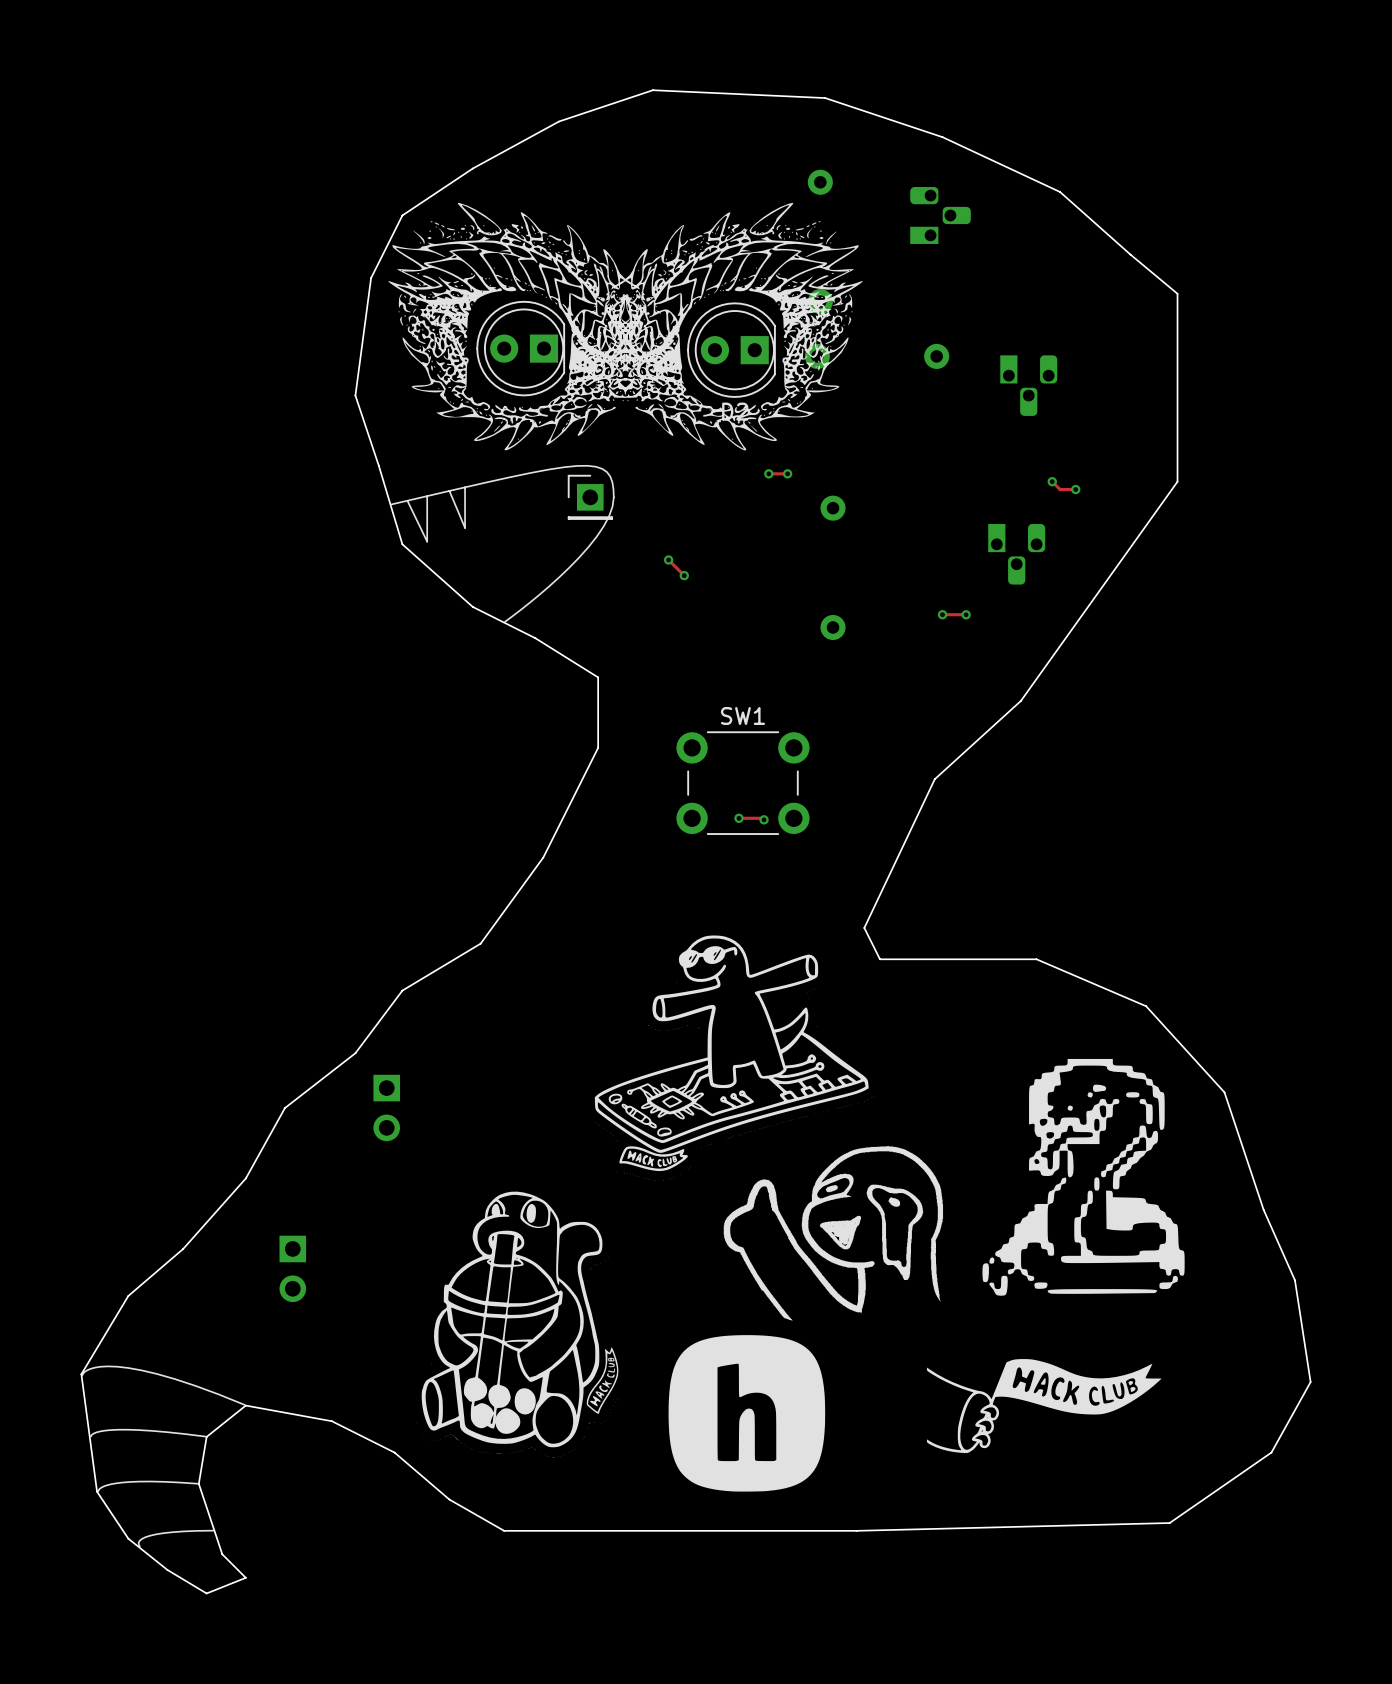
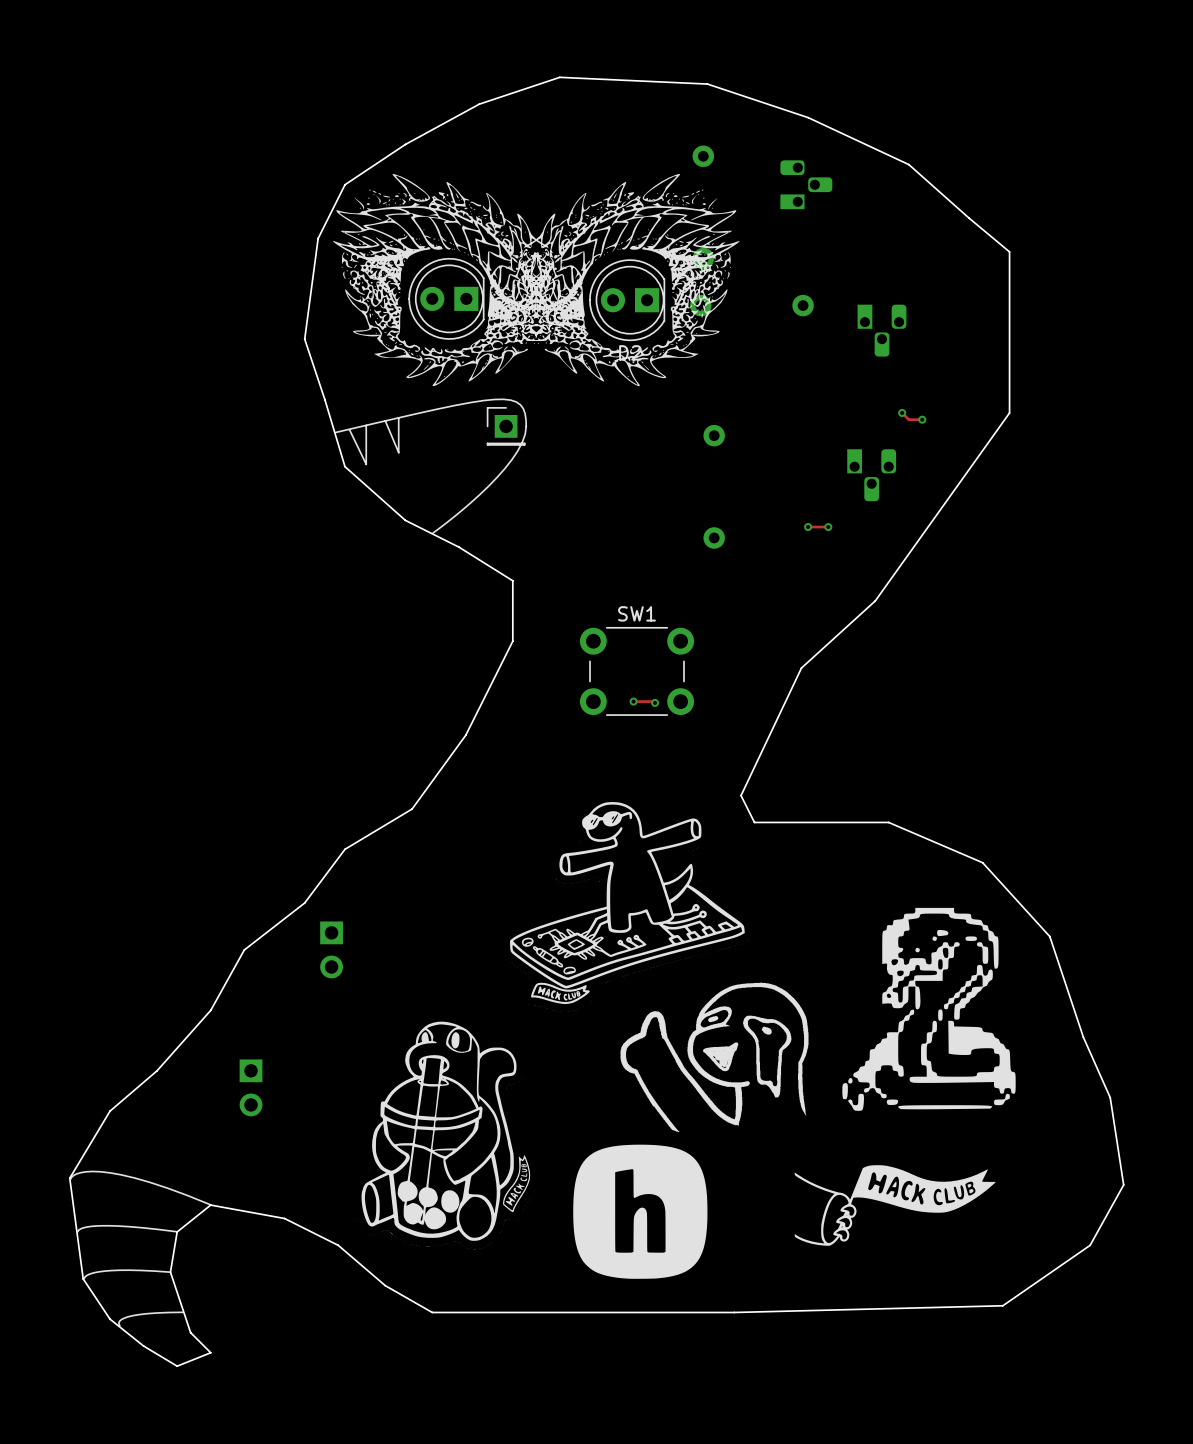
track: (768, 473) (787, 473) -> none
via: (768, 473) -> none
via: (787, 473) -> none
track: (668, 559) (684, 575) -> none
via: (668, 559) -> none
via: (684, 575) -> none

